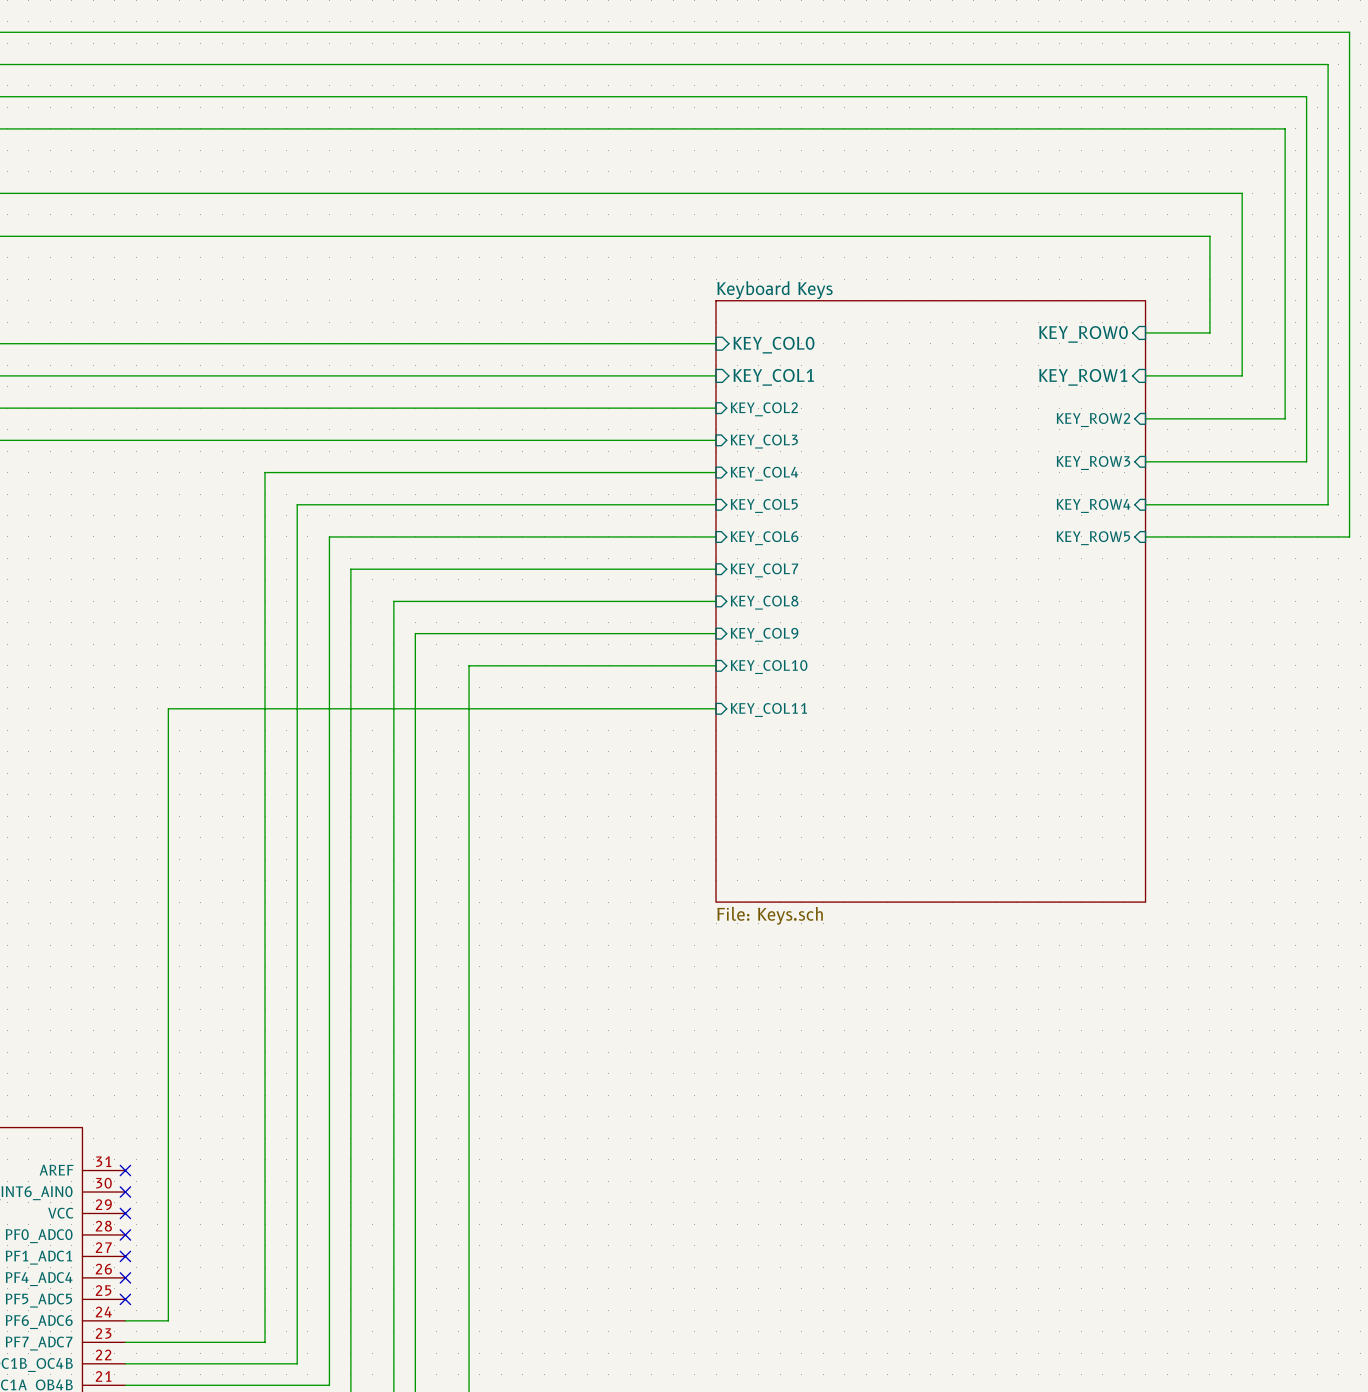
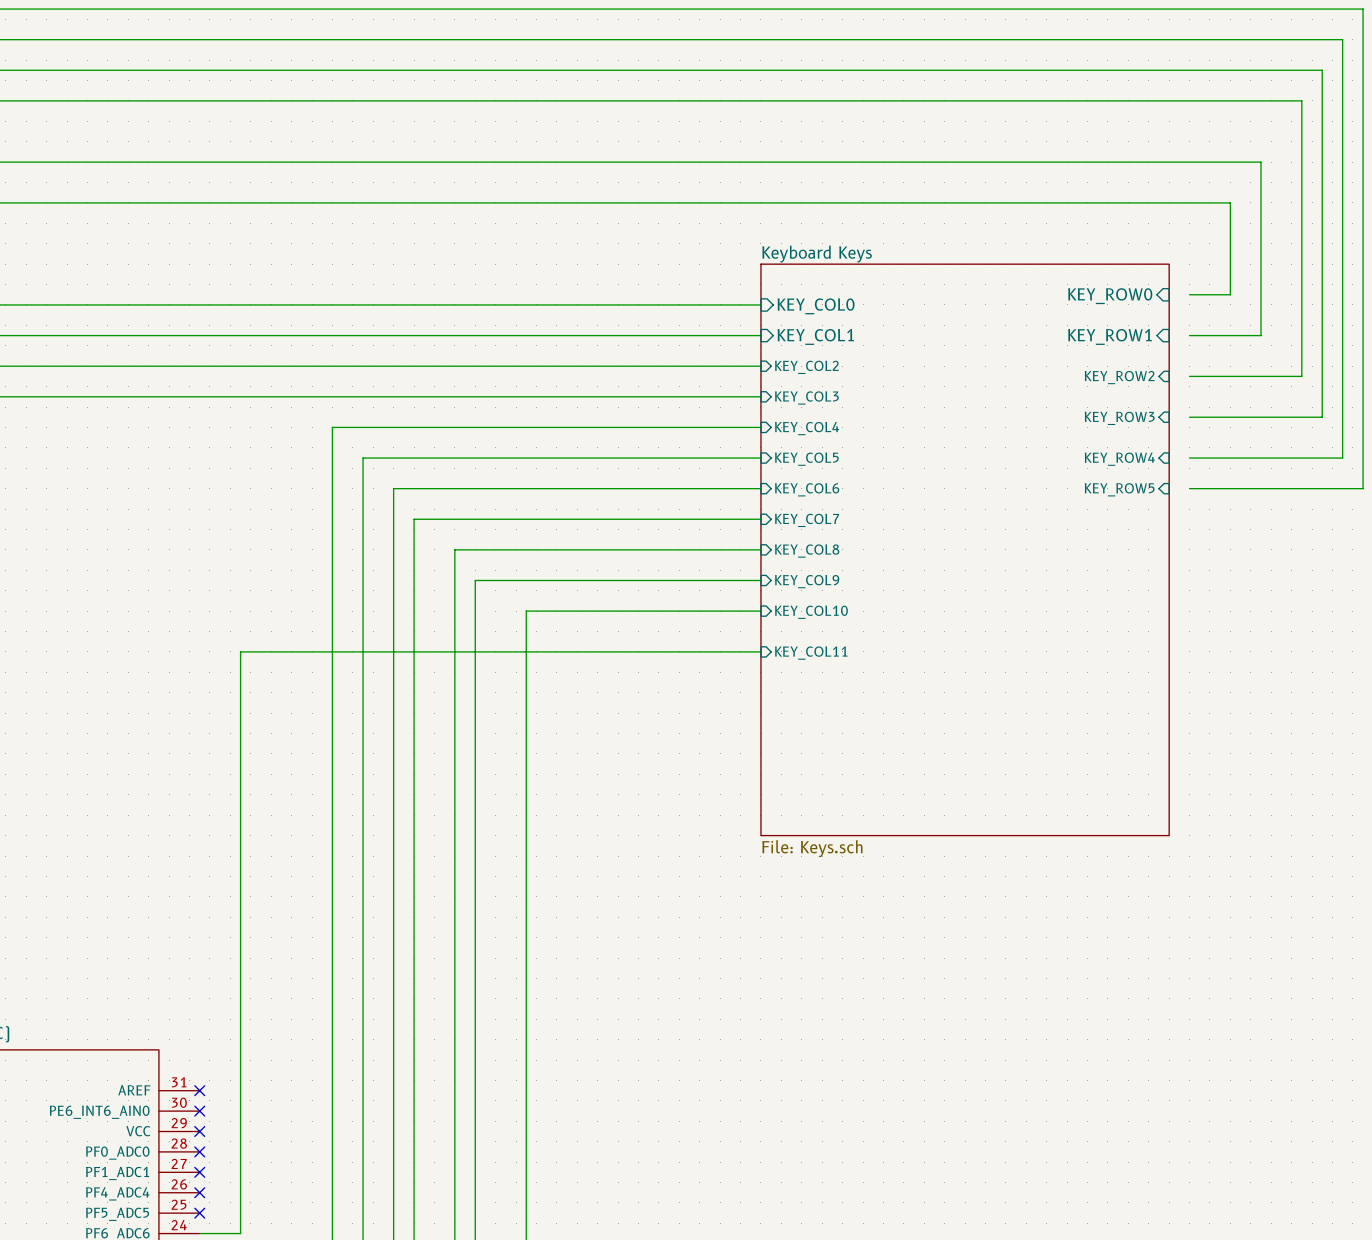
wire: (1145, 332) (1167, 332) -> none
wire: (1145, 375) (1167, 375) -> none
wire: (1145, 418) (1167, 418) -> none
wire: (1145, 461) (1167, 461) -> none
wire: (1145, 504) (1167, 504) -> none
wire: (1145, 536) (1167, 536) -> none

